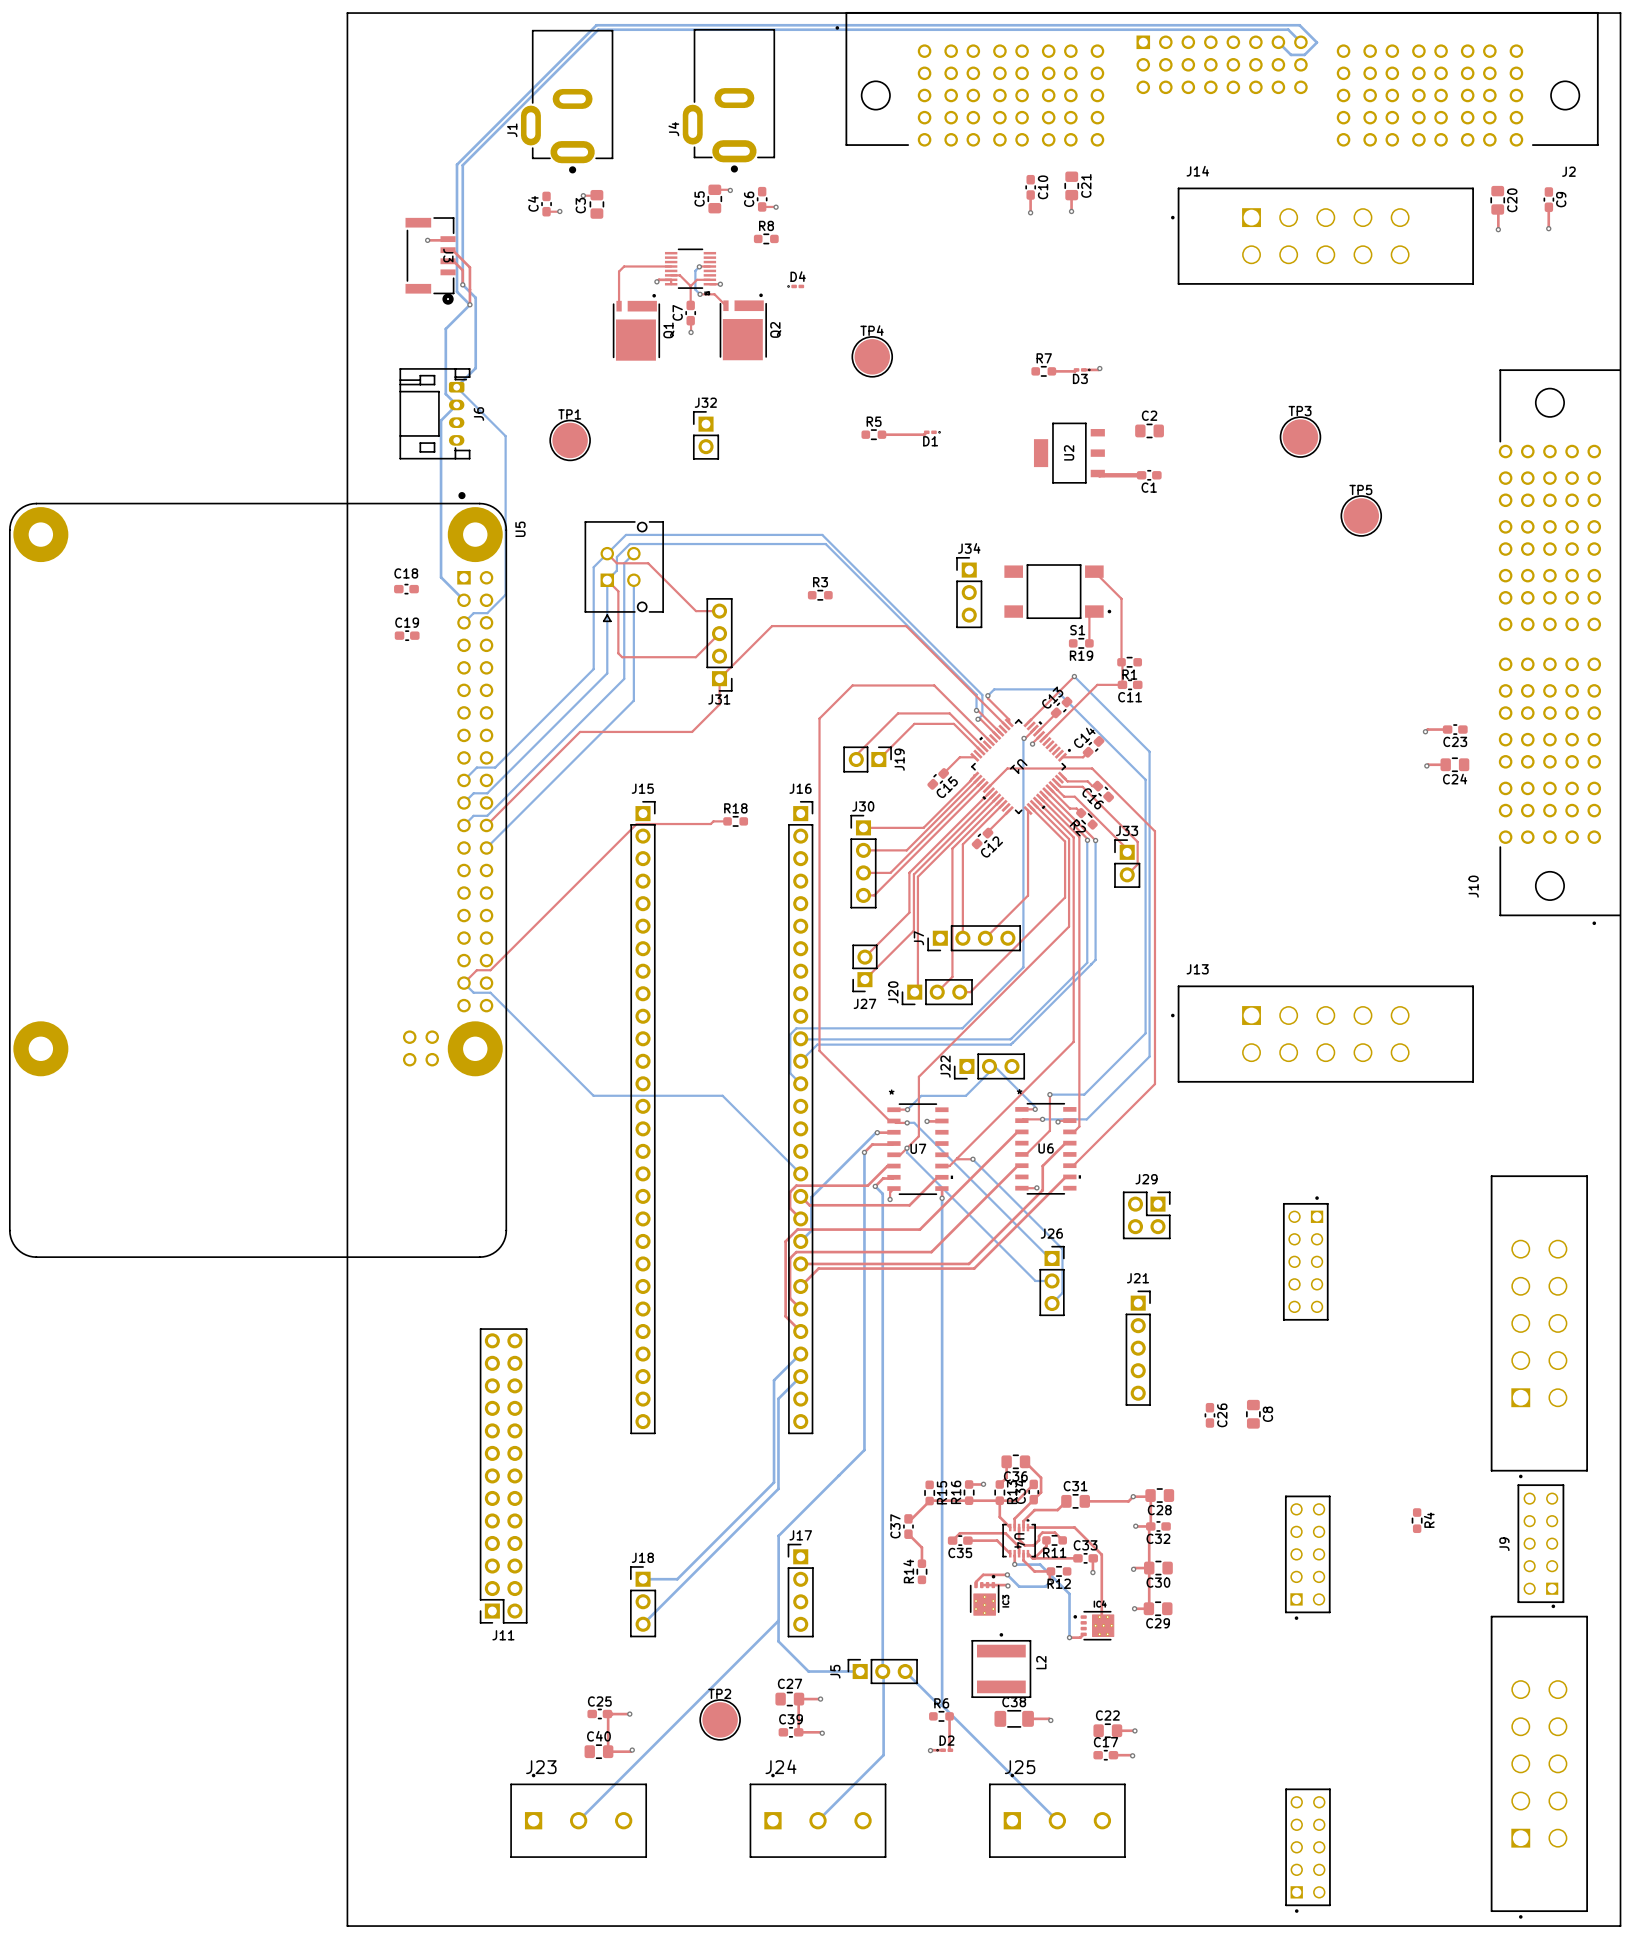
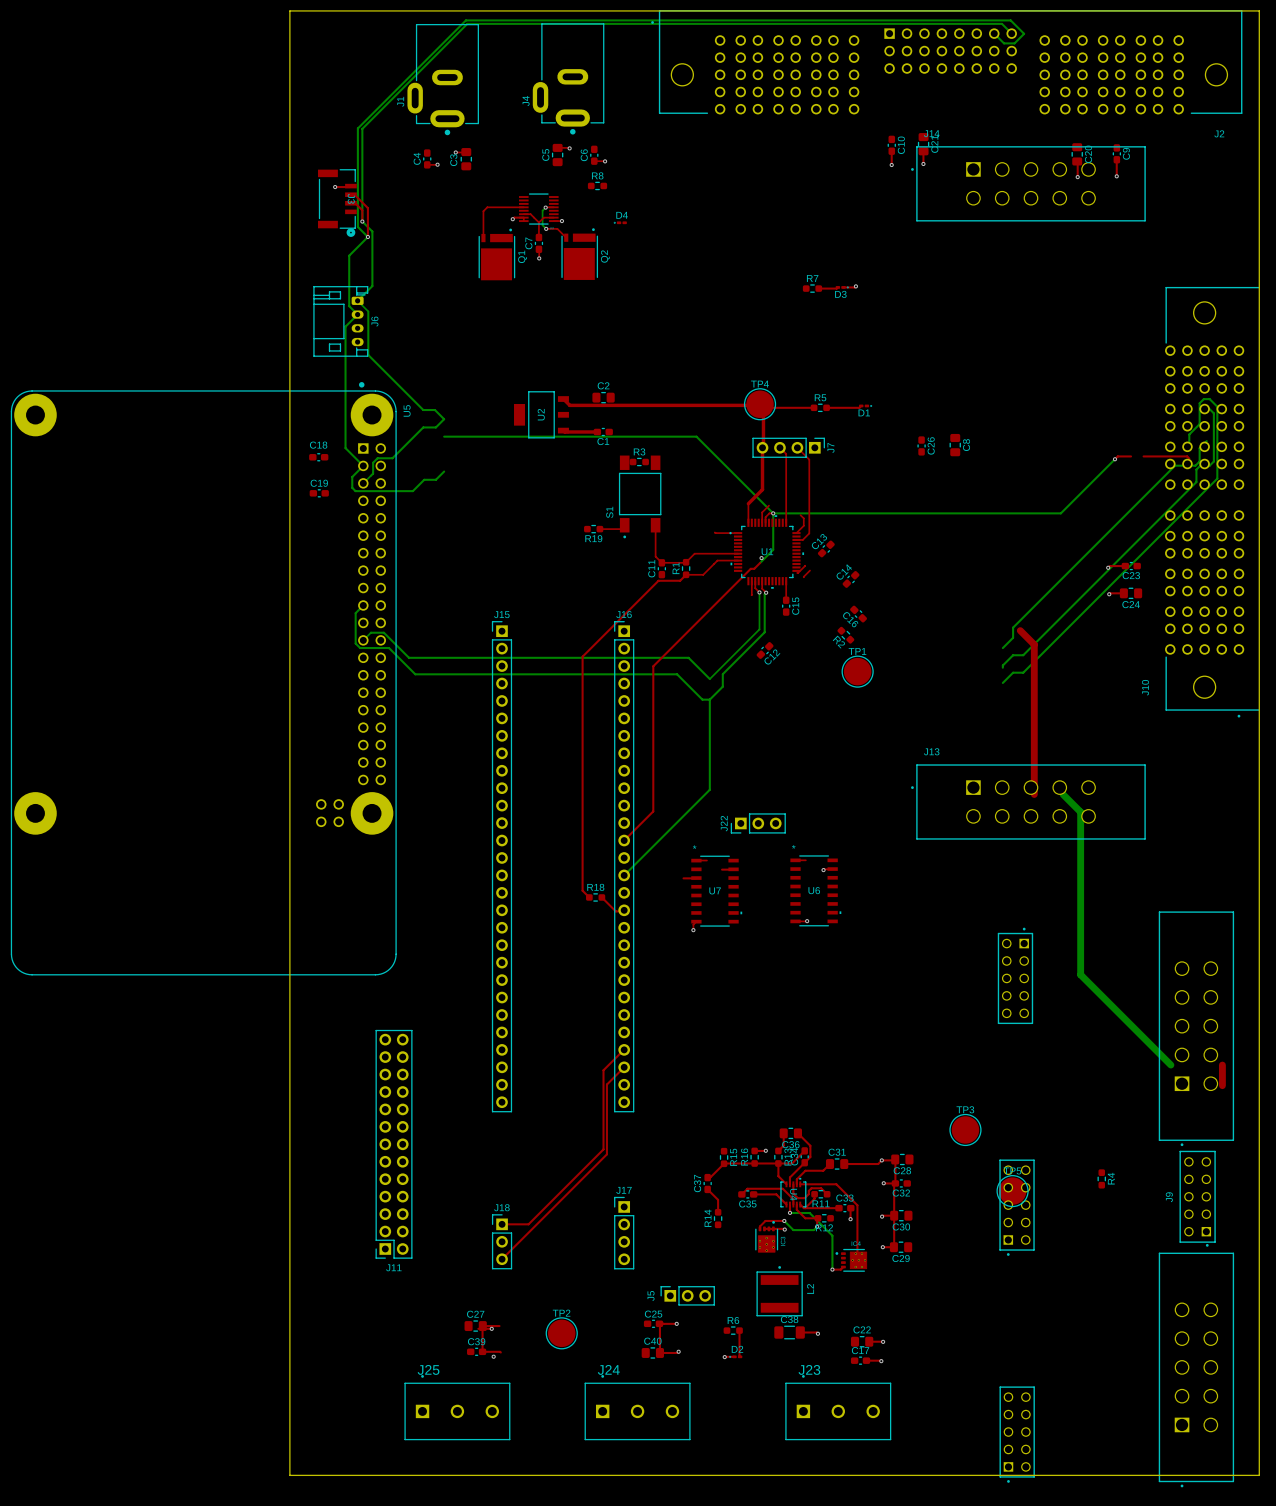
board edge: (369, 13) (347, 13) (347, 1926) (1620, 1926) (1620, 1903) -> (289, 10) (289, 1475) (1259, 1475)
C21 position: (1071, 185) -> (923, 144)
C10 position: (1030, 187) -> (891, 145)
top track: none -> (923, 151) (923, 163)
top track: (1030, 195) (1030, 212) -> (891, 151) (891, 165)
top track: (1071, 195) (1071, 211) -> none
C9 position: (1548, 199) -> (1116, 153)
C20 position: (1497, 200) -> (1077, 154)
top track: none -> (1116, 159) (1116, 176)
top track: none -> (1077, 161) (1077, 177)
top track: (1548, 207) (1548, 228) -> none
via: none -> (923, 163)
top track: (1498, 210) (1498, 229) -> none
via: (1071, 211) -> none
via: none -> (891, 165)
via: (1030, 212) -> none
via: none -> (1116, 176)
via: none -> (1077, 177)
via: (1548, 228) -> none
via: (1498, 229) -> none
TP4 position: (872, 356) -> (760, 404)
bottom track: (470, 400) (505, 436) (505, 594) (487, 613) (473, 613) -> (368, 311) (368, 355) (423, 410) (434, 410) (444, 419) (435, 427) (423, 427) (392, 458) (377, 458) (373, 462) (373, 473) (370, 475)
C2 position: (1149, 430) -> (603, 397)
top track: (926, 432) (924, 434) (881, 434) -> (861, 405) (859, 407) (826, 407)
D1 position: (932, 432) -> (865, 405)
R5 position: (873, 434) -> (820, 407)
J32: (706, 435) -> none
TP3 position: (1300, 437) -> (965, 1129)
TP1 position: (570, 440) -> (857, 671)
U2 position: (1069, 453) -> (541, 414)
top track: (1097, 473) (1099, 475) (1141, 475) -> none
C1 position: (1149, 475) -> (603, 431)
top track: none -> (563, 399) (569, 405) (760, 404)
TP5 position: (1361, 515) -> (1012, 1191)
top track: none -> (760, 404) (763, 407) (762, 489) (748, 503) (748, 522)
top track: none -> (760, 404) (763, 407) (814, 407)
bottom track: none -> (1206, 406) (1213, 413) (1213, 461) (1209, 465) (1200, 465) (1196, 469) (1196, 482) (1023, 655) (1013, 655) (1002, 667)
top track: (607, 553) (616, 563) (648, 563) (696, 611) (719, 611) -> none
bottom track: (633, 553) (624, 563) (624, 678) (487, 815) (473, 815) -> (759, 592) (759, 629) (709, 679) (688, 657) (409, 657) (383, 632) (370, 632)
top track: none -> (563, 430) (597, 431)
bottom track: none -> (444, 436) (696, 436) (773, 513)
bottom track: none -> (1189, 441) (1189, 434) (1199, 424) (1199, 403) (1203, 399) (1209, 399) (1217, 406) (1217, 478) (1023, 672) (1013, 672) (1002, 682)
bottom track: none -> (1206, 441) (1199, 448) (1199, 461) (1195, 465) (1175, 465) (1013, 627) (1013, 637) (1002, 648)
part: (624, 571) -> none
top track: (1094, 571) (1121, 598) (1122, 684) (1097, 684) (1043, 738) -> none
top track: none -> (780, 447) (786, 453) (786, 522)
top track: none -> (797, 447) (809, 459) (809, 533) (802, 539) (796, 539)
top track: (607, 580) (618, 591) (618, 653) (622, 657) (695, 657) (719, 633) -> none
bottom track: (633, 580) (633, 700) (486, 847) -> none
top track: none -> (1131, 456) (1117, 456) (1115, 459)
top track: none -> (1143, 456) (1187, 456) (1189, 458)
S1 rotation: 0° (1057, 591) -> 90° clockwise (640, 496)
S1 position: (1057, 591) -> (640, 496)
bottom track: none -> (1115, 459) (1060, 513) (773, 513)
via: none -> (1115, 459)
J34: (969, 592) -> none
bottom track: none -> (363, 465) (352, 476) (352, 487) (355, 491) (412, 491) (424, 479) (435, 479) (444, 471)
top track: (1094, 611) (1089, 616) (1089, 643) -> none
R19 position: (1081, 643) -> (593, 529)
J31: (719, 644) -> none
top track: none -> (769, 505) (762, 512) (762, 522)
top track: none -> (773, 513) (769, 513) (765, 517) (765, 522)
bottom track: none -> (773, 513) (773, 549) (760, 562)
via: none -> (773, 513)
R1 rotation: 0° (1129, 662) -> 90° clockwise (686, 568)
R1 position: (1129, 662) -> (686, 568)
top track: none -> (800, 515) (803, 518) (803, 525) (796, 533)
top track: none -> (624, 525) (620, 529) (599, 529)
top track: none -> (655, 525) (655, 556) (661, 562) (685, 562) (694, 553) (738, 553)
top track: (1074, 676) (1028, 722) -> none
bottom track: (1074, 676) (1149, 751) (1149, 1056) (1086, 1119) (1042, 1119) -> none
via: (1074, 676) -> none
top track: (719, 678) (772, 626) (906, 626) (1006, 725) -> none
top track: (719, 678) (719, 704) (692, 731) (580, 731) (486, 825) -> none
C11 rotation: 0° (1130, 684) -> 90° clockwise (661, 568)
C11 position: (1130, 684) -> (661, 568)
top track: none -> (714, 532) (738, 533)
top track: (987, 695) (987, 698) (1009, 719) (1009, 722) -> none
bottom track: (987, 695) (994, 689) (1055, 689) (1145, 779) (1145, 1033) (1084, 1094) (1049, 1094) -> none
via: (987, 695) -> none
top track: (976, 710) (999, 732) -> none
bottom track: (976, 710) (976, 694) (825, 544) (629, 544) (616, 557) (616, 570) (607, 580) (607, 673) (487, 793) (473, 793) (464, 802) -> none
via: (976, 710) -> none
top track: (1056, 712) (1037, 732) -> none
top track: (978, 719) (980, 719) (996, 735) -> none
bottom track: (978, 719) (982, 714) (982, 694) (822, 534) (626, 534) (593, 567) (593, 669) (495, 767) (476, 767) (464, 780) -> (709, 699) (702, 699) (677, 674) (415, 674) (389, 648) (360, 648) (355, 643) (355, 613) (363, 605)
top track: none -> (738, 560) (717, 560) (703, 574) (686, 574) (680, 580) (658, 580) (582, 656) (582, 890) (589, 897)
top track: none -> (760, 562) (754, 568) (750, 568) (653, 666) (653, 811) (624, 840)
bottom track: (1023, 738) (1023, 967) (962, 1028) (796, 1028) (790, 1034) (790, 1073) (800, 1083) -> none
via: (1024, 738) -> none
top track: (990, 741) (934, 685) (852, 685) (819, 718) (819, 1050) (889, 1121) (907, 1122) -> none
via: (1032, 744) -> none
top track: (984, 747) (949, 713) (898, 713) (856, 755) (856, 759) -> none
top track: none -> (751, 581) (751, 595)
top track: none -> (755, 581) (755, 588) (759, 592)
top track: none -> (762, 581) (762, 588) (766, 592)
top track: none -> (786, 581) (786, 600)
top track: (981, 751) (953, 723) (914, 723) (878, 759) -> none
top track: (1088, 752) (1083, 757) (1062, 757) -> none
top track: (974, 757) (959, 757) (943, 773) -> none
J19: (867, 759) -> none
via: none -> (759, 592)
bottom track: none -> (766, 592) (764, 632) (722, 674) (722, 686) (709, 699)
via: none -> (766, 592)
U1 rotation: 0° (1020, 766) -> 135° counterclockwise (766, 551)
U1 position: (1020, 766) -> (766, 551)
top track: (974, 776) (923, 827) (863, 827) -> none
top track: (1062, 776) (1067, 781) (1087, 781) (1092, 786) (1097, 786) -> none
C15 rotation: 0° (938, 778) -> 45° counterclockwise (786, 606)
C15 position: (938, 778) -> (786, 606)
top track: (977, 779) (906, 850) (863, 850) -> none
top track: (981, 782) (890, 872) (863, 872) -> none
top track: (1056, 782) (1060, 786) (1082, 786) (1137, 841) (1137, 864) (1127, 874) -> none
top track: (984, 785) (874, 895) (863, 895) -> none
top track: (1053, 785) (1064, 796) (1074, 796) (1127, 849) (1127, 852) -> none
top track: (987, 788) (1007, 768) (1092, 768) (1154, 831) (1154, 1084) (1073, 1165) (1069, 1165) -> none
top track: (1049, 788) (1069, 808) (1076, 808) (1081, 813) -> none
top track: (990, 791) (909, 872) (909, 912) (864, 957) -> none
top track: (1046, 791) (1095, 840) -> none
top track: (993, 794) (913, 874) (913, 930) (864, 979) -> none
top track: (1043, 794) (1087, 840) -> none
top track: (996, 798) (917, 876) (917, 988) (914, 992) -> none
top track: (1040, 798) (1079, 836) (1079, 1126) (1074, 1131) (1069, 1131) -> none
J15 footprint: [630, 801, 656, 1434] -> [492, 621, 512, 1113]
J16 footprint: [788, 801, 814, 1434] -> [614, 621, 635, 1113]
top track: (999, 801) (952, 848) (952, 976) (937, 992) -> none
top track: (1037, 801) (1073, 837) (1073, 1041) (949, 1166) (941, 1166) -> none
top track: (1002, 804) (962, 844) (962, 938) -> none
top track: (1034, 804) (1069, 839) (1069, 926) (918, 1076) (918, 1136) (900, 1154) (893, 1154) -> none
top track: (1031, 807) (1065, 841) (1065, 897) (970, 992) (959, 992) -> none
top track: (1009, 810) (987, 833) -> none
top track: (1028, 810) (1028, 895) (985, 938) -> none
top track: none -> (1020, 630) (1034, 644) (1034, 794)
top track: (727, 821) (713, 821) (710, 824) (636, 824) (490, 970) (476, 970) (464, 983) -> none
R18 position: (735, 821) -> (595, 897)
bottom track: (1087, 840) (1087, 962) (1011, 1038) -> none
via: (1087, 840) -> none
bottom track: (1095, 840) (1095, 959) (1091, 964) -> none
via: (1095, 840) -> none
J30: (863, 861) -> none
J33: (1127, 863) -> none
bottom track: none -> (709, 699) (709, 789) (624, 875)
J7 rotation: 0° (974, 938) -> 180° (788, 447)
J7 position: (974, 938) -> (788, 447)
bottom track: (1091, 964) (1012, 1042) -> none
J27: (864, 968) -> none
bottom track: (464, 983) (473, 992) (490, 992) (593, 1095) (722, 1095) (800, 1173) -> none
J20: (937, 992) -> none
bottom track: none -> (1063, 794) (1080, 812) (1080, 974) (1170, 1065)
bottom track: (800, 1038) (1011, 1038) -> none
bottom track: (1012, 1042) (1010, 1044) (817, 1044) (800, 1061) -> none
J22 position: (989, 1066) -> (758, 823)
top track: (1049, 1094) (1049, 1130) (1026, 1154) (1021, 1154) -> none
via: (1049, 1094) -> none
via: (907, 1109) -> none
bottom track: (1035, 1109) (1035, 1106) (994, 1066) (989, 1066) (989, 1072) (965, 1095) (921, 1095) (907, 1109) -> none
via: (1035, 1109) -> none
top track: (1042, 1119) (1021, 1120) -> none
via: (1042, 1119) -> none
via: (927, 1121) -> none
bottom track: (907, 1122) (914, 1122) (1049, 1258) (1052, 1258) -> none
via: (907, 1122) -> none
top track: (1017, 1131) (919, 1229) (797, 1229) (785, 1241) (785, 1316) (800, 1331) -> none
bottom track: (877, 1132) (811, 1197) (811, 1230) (800, 1241) -> none
via: (877, 1132) -> none
top track: (1065, 1143) (1042, 1165) (1042, 1190) (968, 1263) (800, 1263) -> none
top track: (892, 1144) (872, 1144) (864, 1152) -> none
bottom track: (907, 1148) (907, 1152) (1035, 1280) (1052, 1280) -> none
via: (907, 1148) -> none
bottom track: (864, 1152) (864, 1450) (839, 1475) -> none
via: (864, 1152) -> none
top track: none -> (601, 897) (615, 911) (624, 910)
top track: (957, 1158) (972, 1159) -> none
bottom track: (972, 1159) (1062, 1249) (1062, 1293) (1052, 1303) -> none
via: (972, 1159) -> none
top track: (1017, 1165) (931, 1252) (796, 1252) (790, 1258) (790, 1298) (800, 1309) -> none
top track: (893, 1166) (887, 1166) (867, 1185) (796, 1185) (790, 1191) (790, 1208) (800, 1218) -> none
top track: (1065, 1176) (974, 1268) (818, 1268) (800, 1286) -> none
top track: (893, 1177) (883, 1178) (875, 1186) -> none
top track: (937, 1177) (909, 1205) (809, 1205) (800, 1196) -> none
bottom track: (875, 1186) (882, 1193) (882, 1671) -> none
via: (875, 1186) -> none
top track: (942, 1188) (942, 1198) -> none
bottom track: (942, 1198) (942, 1705) -> none
via: (942, 1198) -> none
J29: (1146, 1215) -> none
J26: (1052, 1280) -> none
J21: (1138, 1348) -> none
bottom track: (800, 1353) (774, 1380) (774, 1482) (677, 1579) (643, 1579) -> none
top track: none -> (624, 1049) (603, 1070) (603, 1149) (528, 1224) (502, 1224)
top track: none -> (1222, 1065) (1222, 1085)
top track: none -> (624, 1067) (606, 1084) (606, 1154) (502, 1259)
bottom track: (800, 1376) (778, 1398) (778, 1488) (643, 1624) -> none
C8 position: (1253, 1414) -> (955, 445)
C26 position: (1209, 1415) -> (921, 445)
bottom track: (839, 1475) (778, 1535) (778, 1620) (578, 1820) -> none
bottom track: (778, 1621) (778, 1641) (808, 1671) (860, 1671) -> none
bottom track: (905, 1671) (939, 1705) (942, 1705) -> none
bottom track: (883, 1672) (883, 1755) (818, 1820) -> none
C27 position: (789, 1699) -> (475, 1326)
top track: (798, 1699) (798, 1732) (822, 1733) -> none
top track: (799, 1699) (820, 1699) -> none
via: (820, 1699) -> none
bottom track: (942, 1705) (1057, 1820) -> none
top track: none -> (663, 1323) (659, 1323) (659, 1352) (678, 1351)
top track: none -> (663, 1323) (676, 1323)
via: none -> (676, 1323)
top track: none -> (499, 1326) (482, 1326) (482, 1351) (500, 1352)
C25 position: (599, 1714) -> (653, 1323)
top track: (608, 1714) (608, 1751) (632, 1750) -> none
C39 position: (791, 1732) -> (476, 1351)
via: (822, 1733) -> none
via: none -> (678, 1351)
C40 position: (598, 1751) -> (652, 1352)
J23 position: (578, 1815) -> (838, 1407)
J25 position: (1057, 1815) -> (457, 1407)

